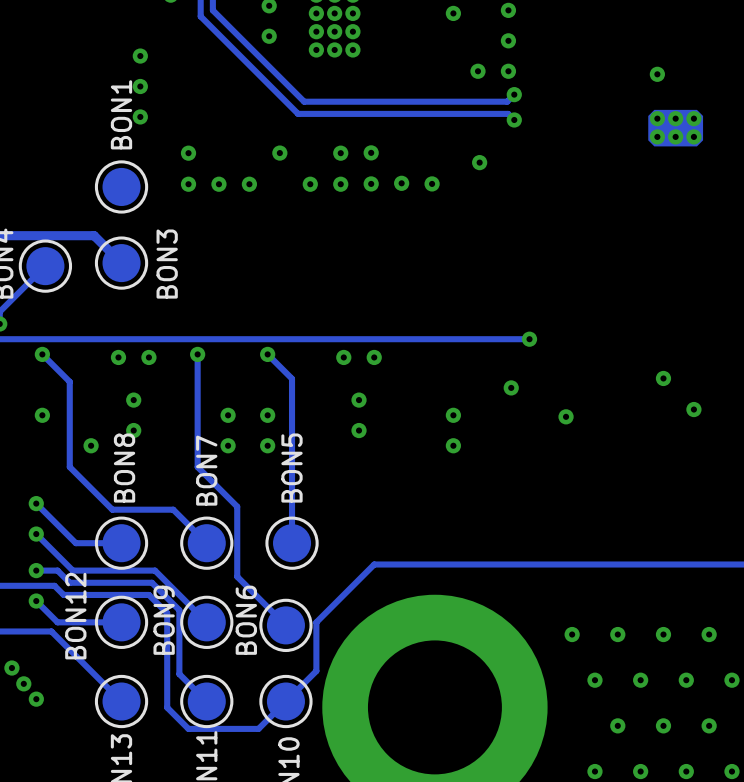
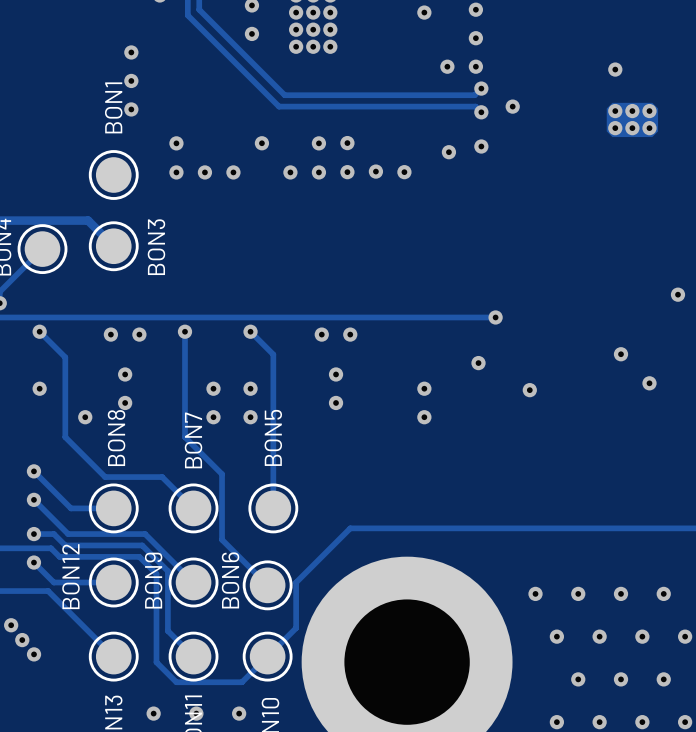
via: none -> (512, 106)
via: none -> (481, 146)
via: none -> (677, 294)
via: none -> (153, 713)
via: none -> (196, 713)
via: none -> (239, 713)

